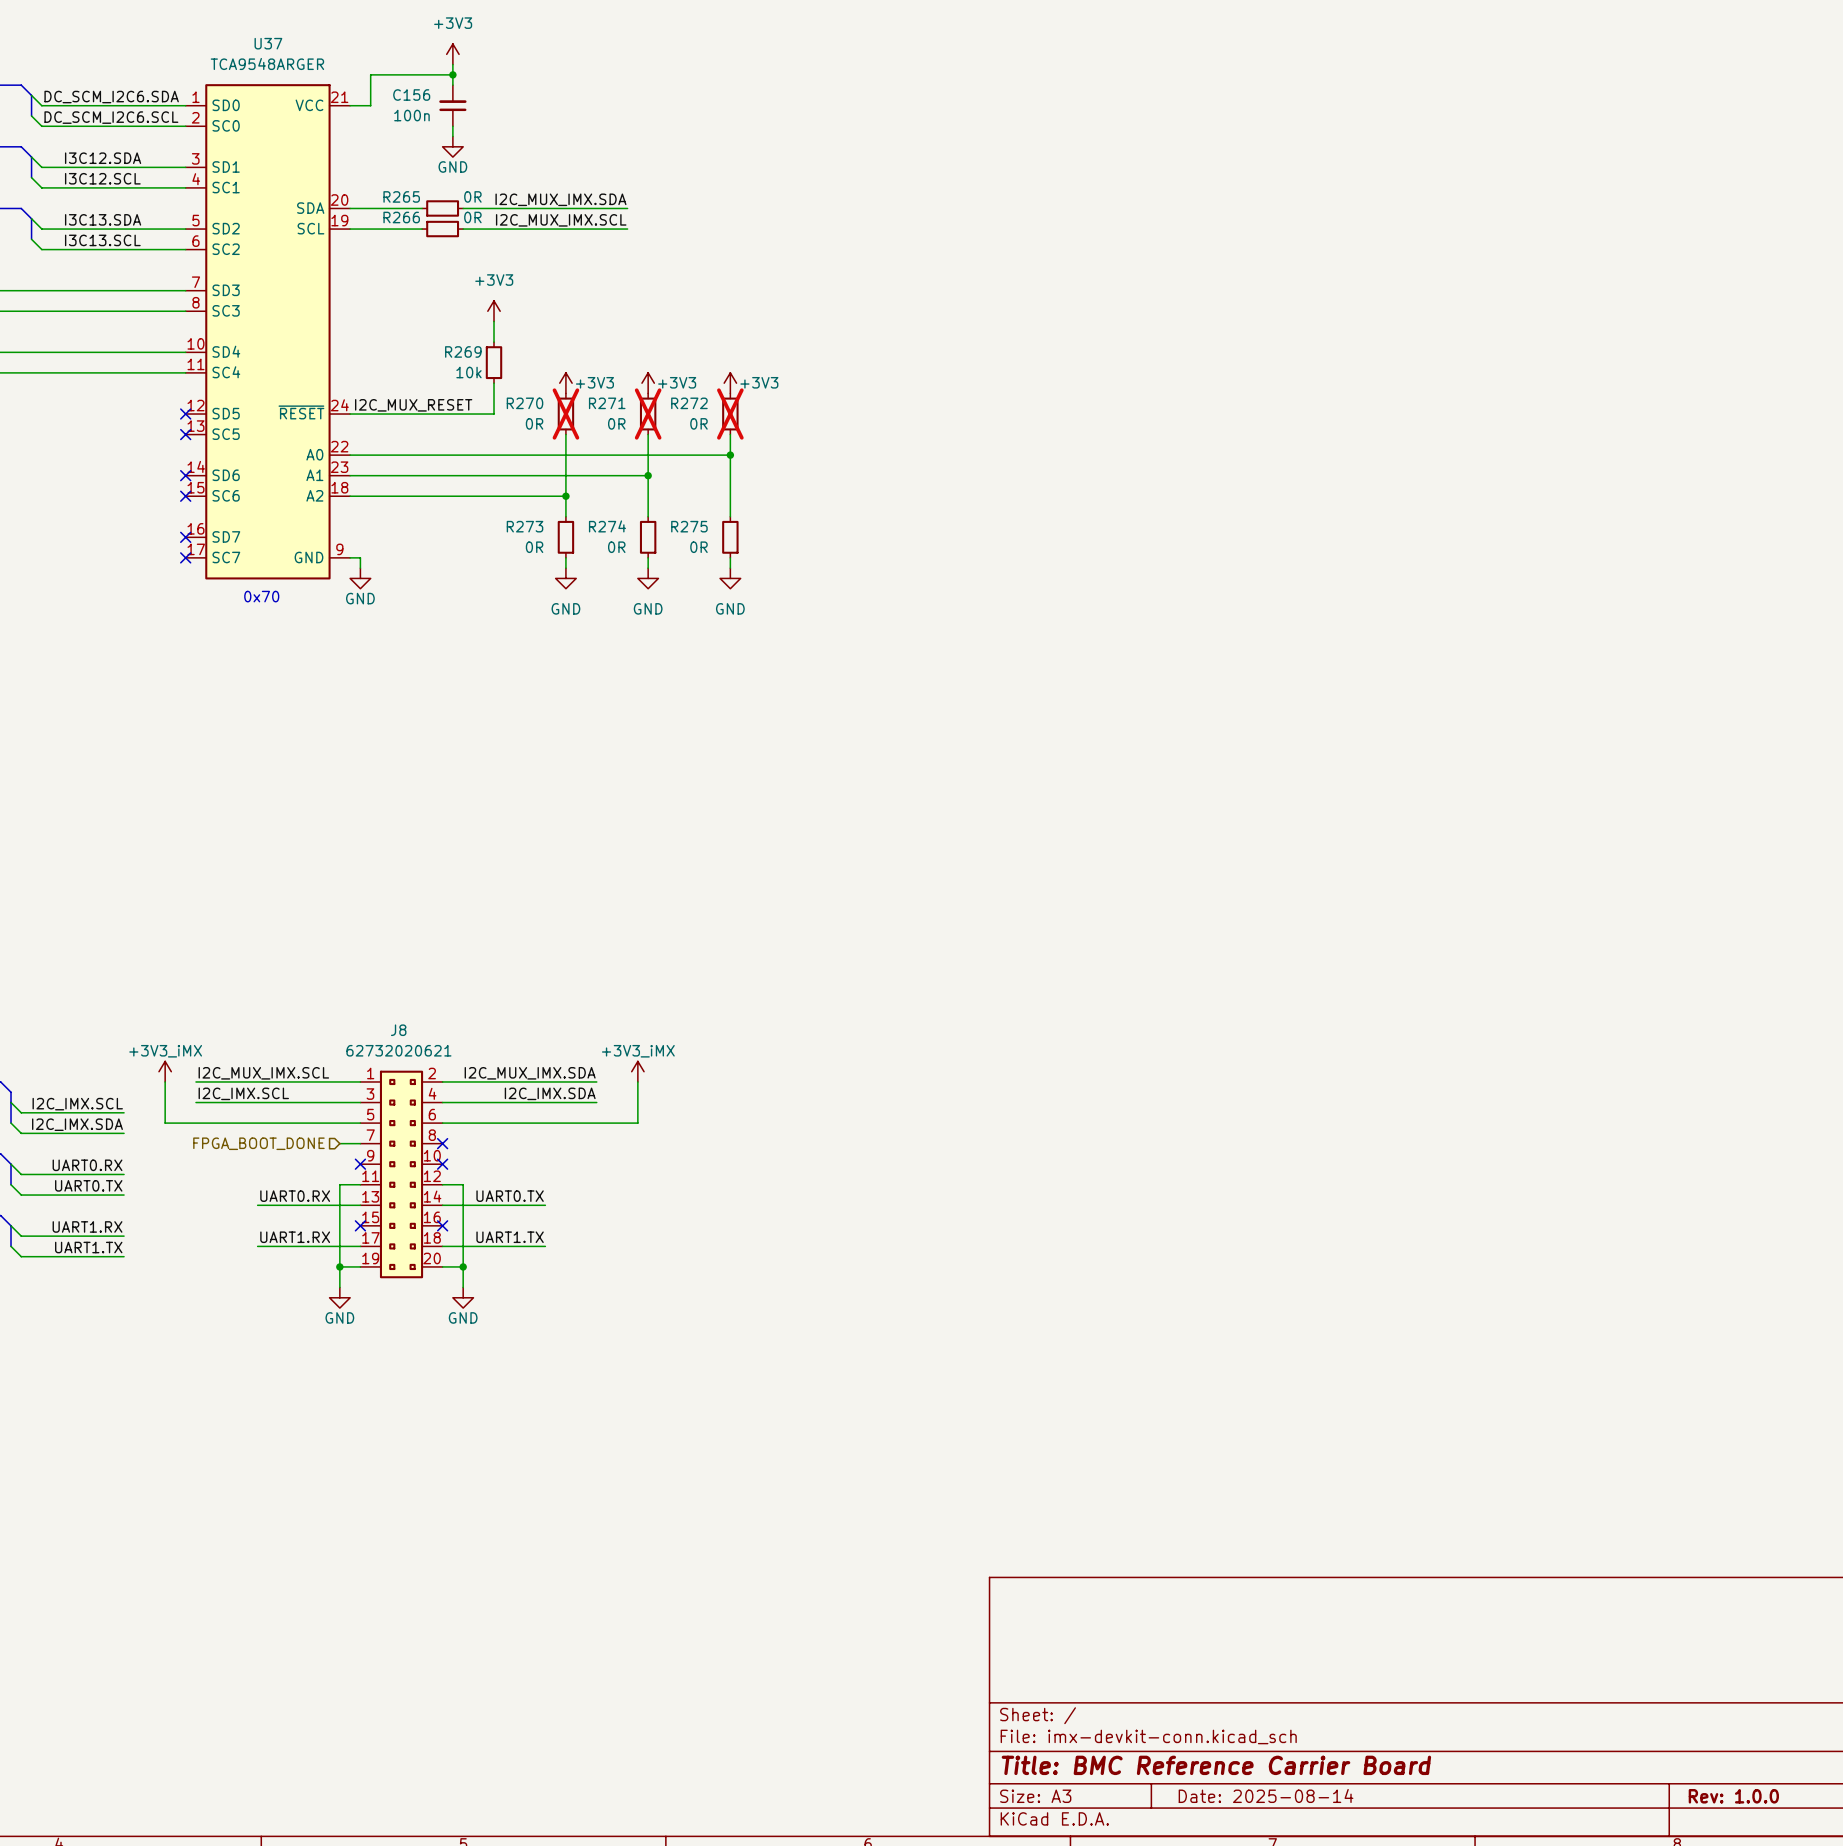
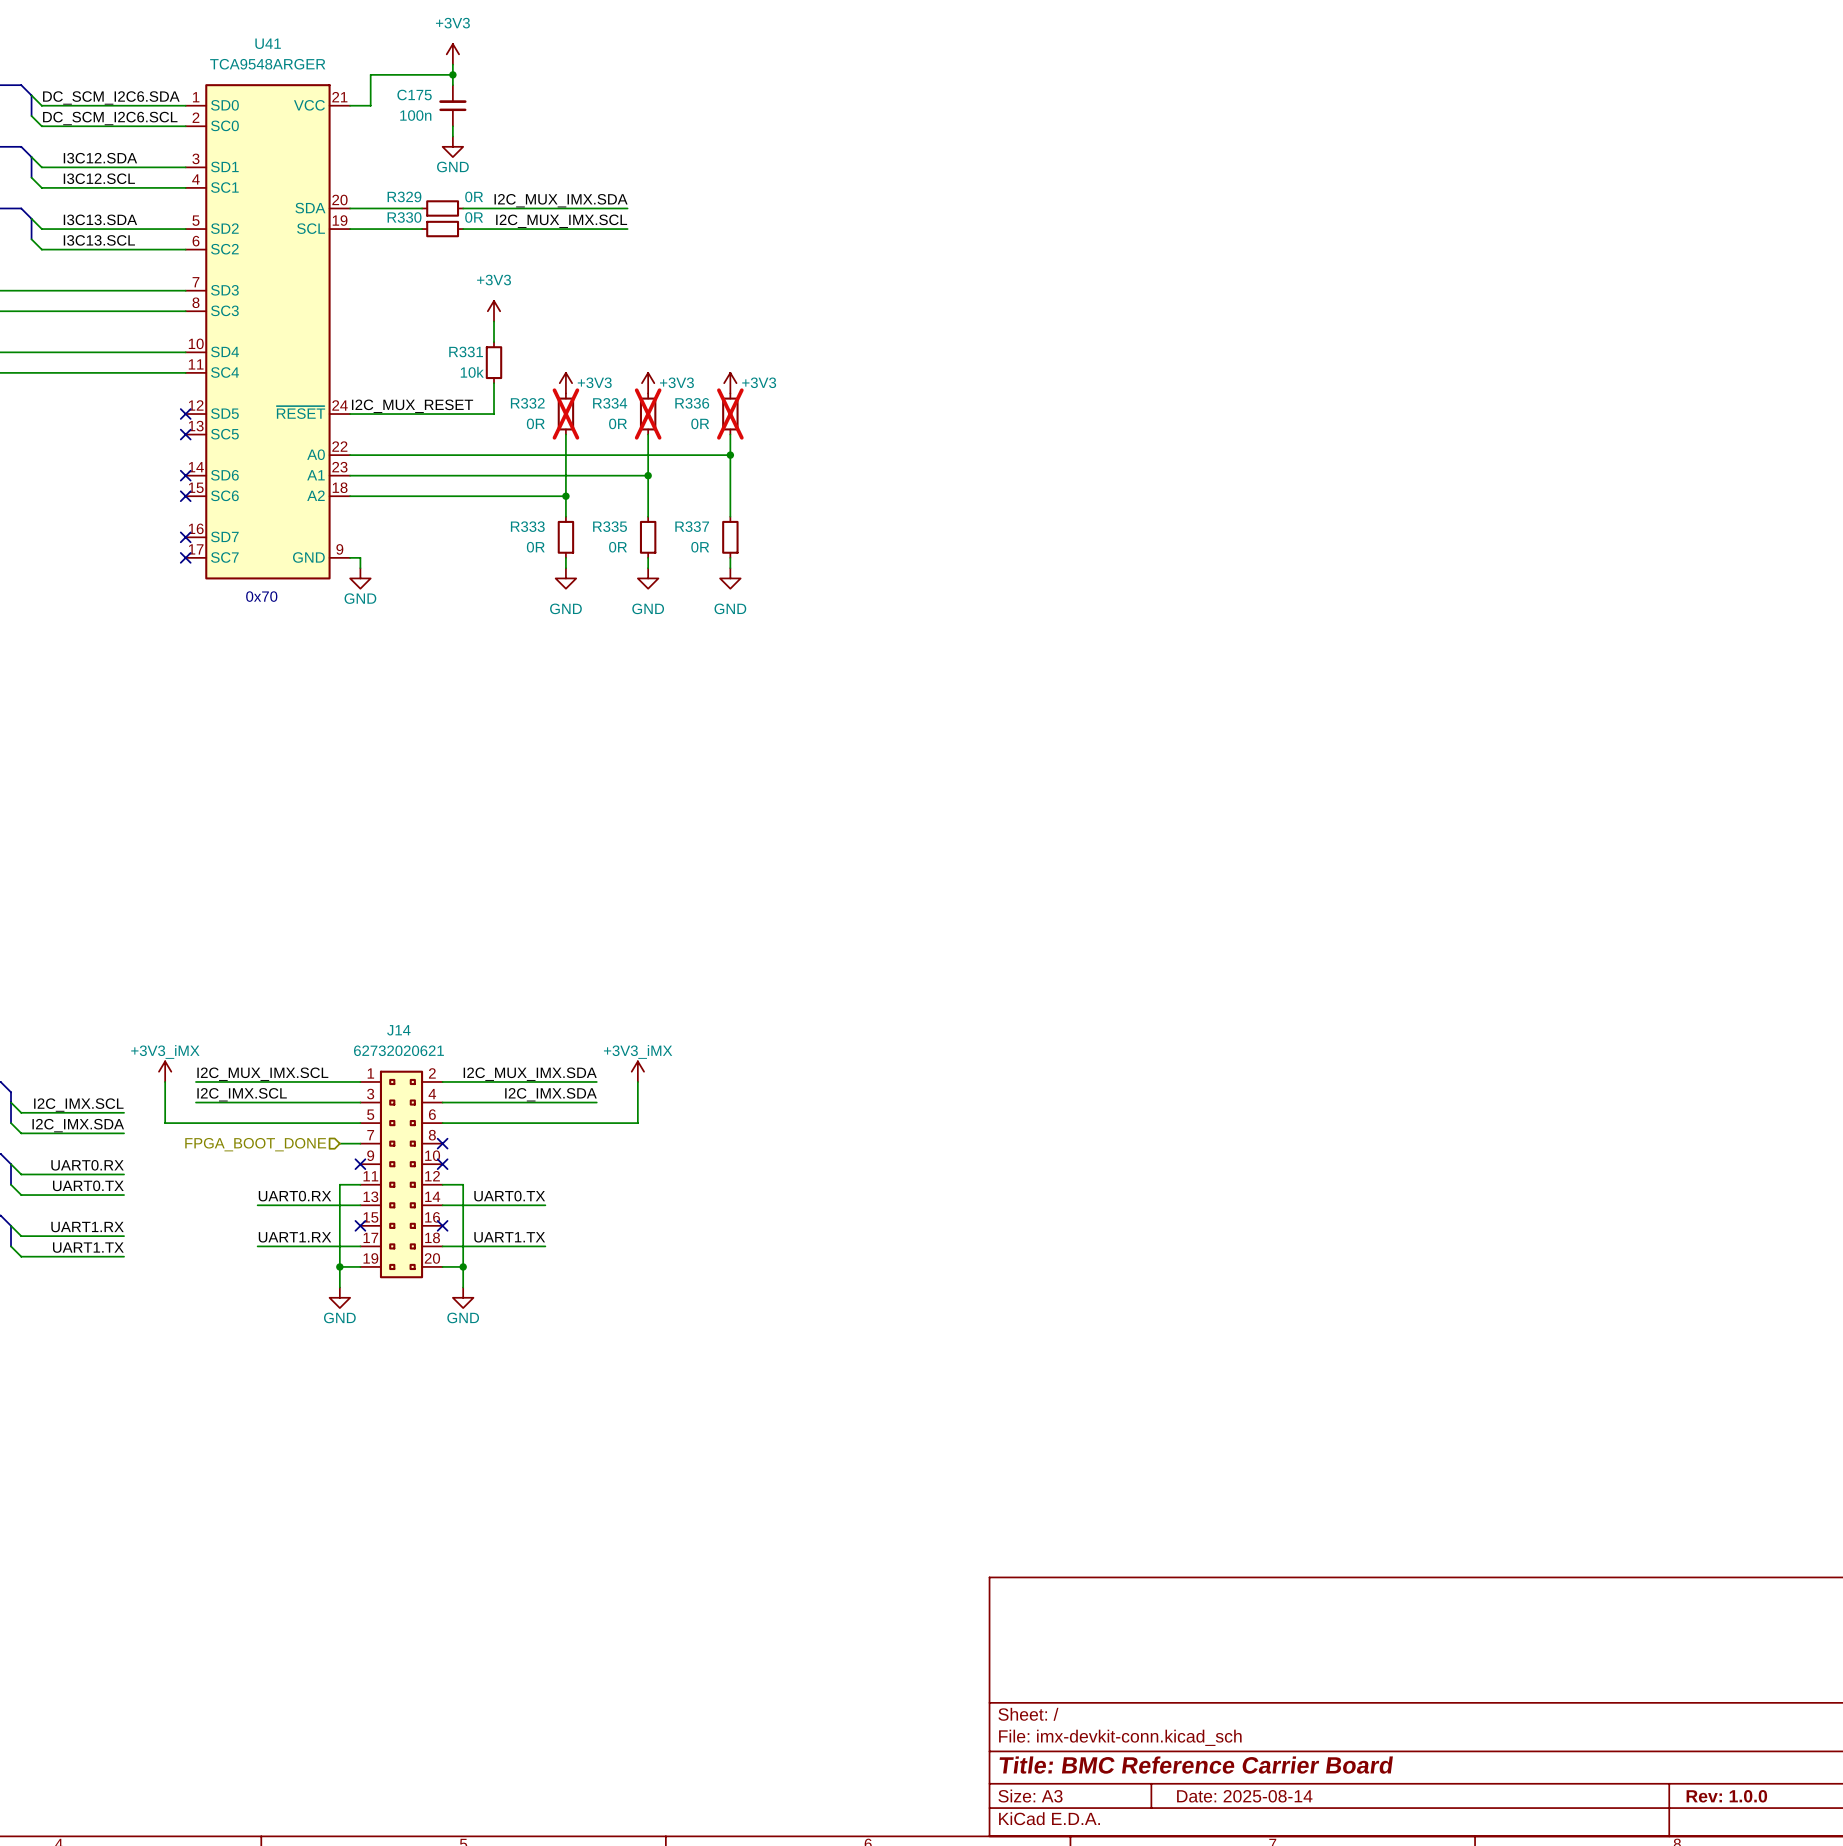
U37 name: U37 (268, 43) -> U41 (268, 43)
C156 name: C156 (411, 95) -> C175 (414, 95)
R265 name: R265 (401, 196) -> R329 (404, 196)
R266 name: R266 (401, 217) -> R330 (404, 217)
R269 name: R269 (463, 351) -> R331 (466, 351)
R270 name: R270 (525, 403) -> R332 (527, 403)
R271 name: R271 (607, 403) -> R334 (610, 403)
R272 name: R272 (689, 403) -> R336 (692, 403)
R273 name: R273 (525, 526) -> R333 (527, 526)
R274 name: R274 (607, 526) -> R335 (610, 526)
R275 name: R275 (689, 526) -> R337 (692, 526)
J8 name: J8 (398, 1030) -> J14 (398, 1030)

